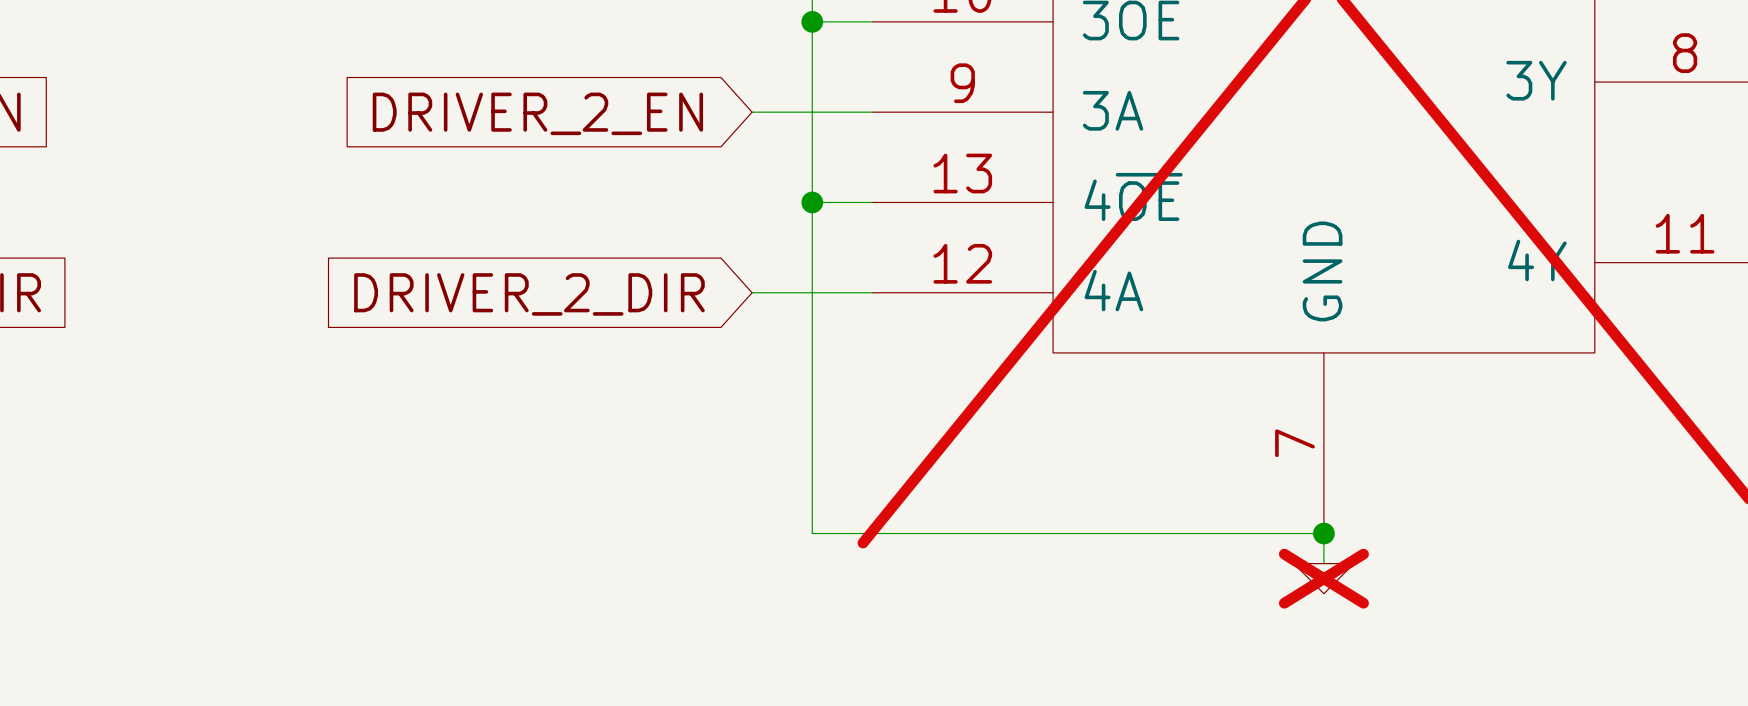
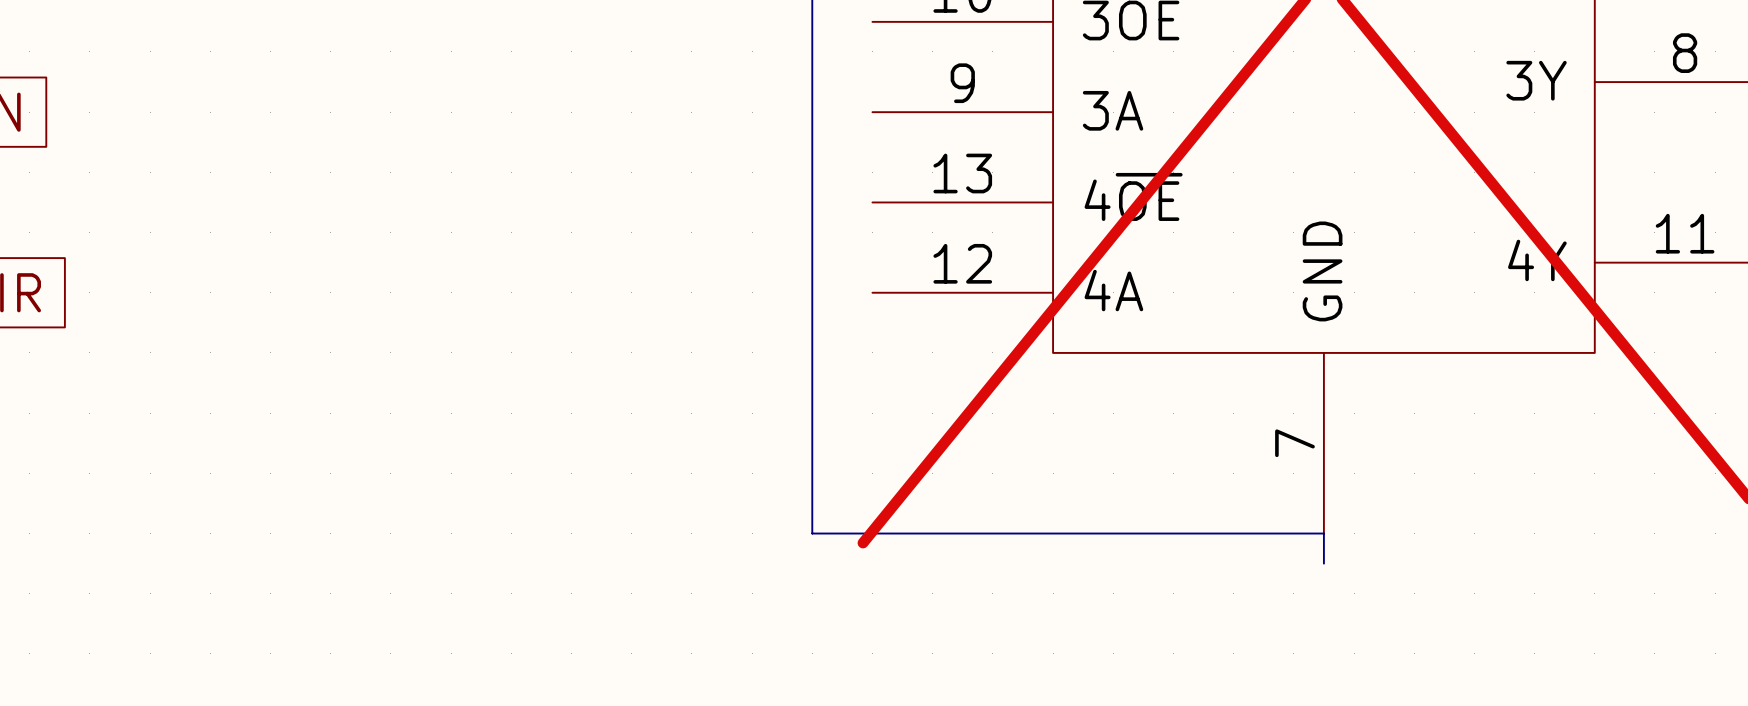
wire: (812, 21) (872, 21) -> none
junction: (812, 21) -> none
wire: (752, 112) (872, 112) -> none
global label: DRIVER_2_EN (537, 113) -> none
wire: (812, 202) (872, 202) -> none
junction: (812, 202) -> none
wire: (752, 292) (872, 292) -> none
global label: DRIVER_2_DIR (529, 294) -> none
junction: (1323, 533) -> none
power symbol: (1323, 578) -> none

